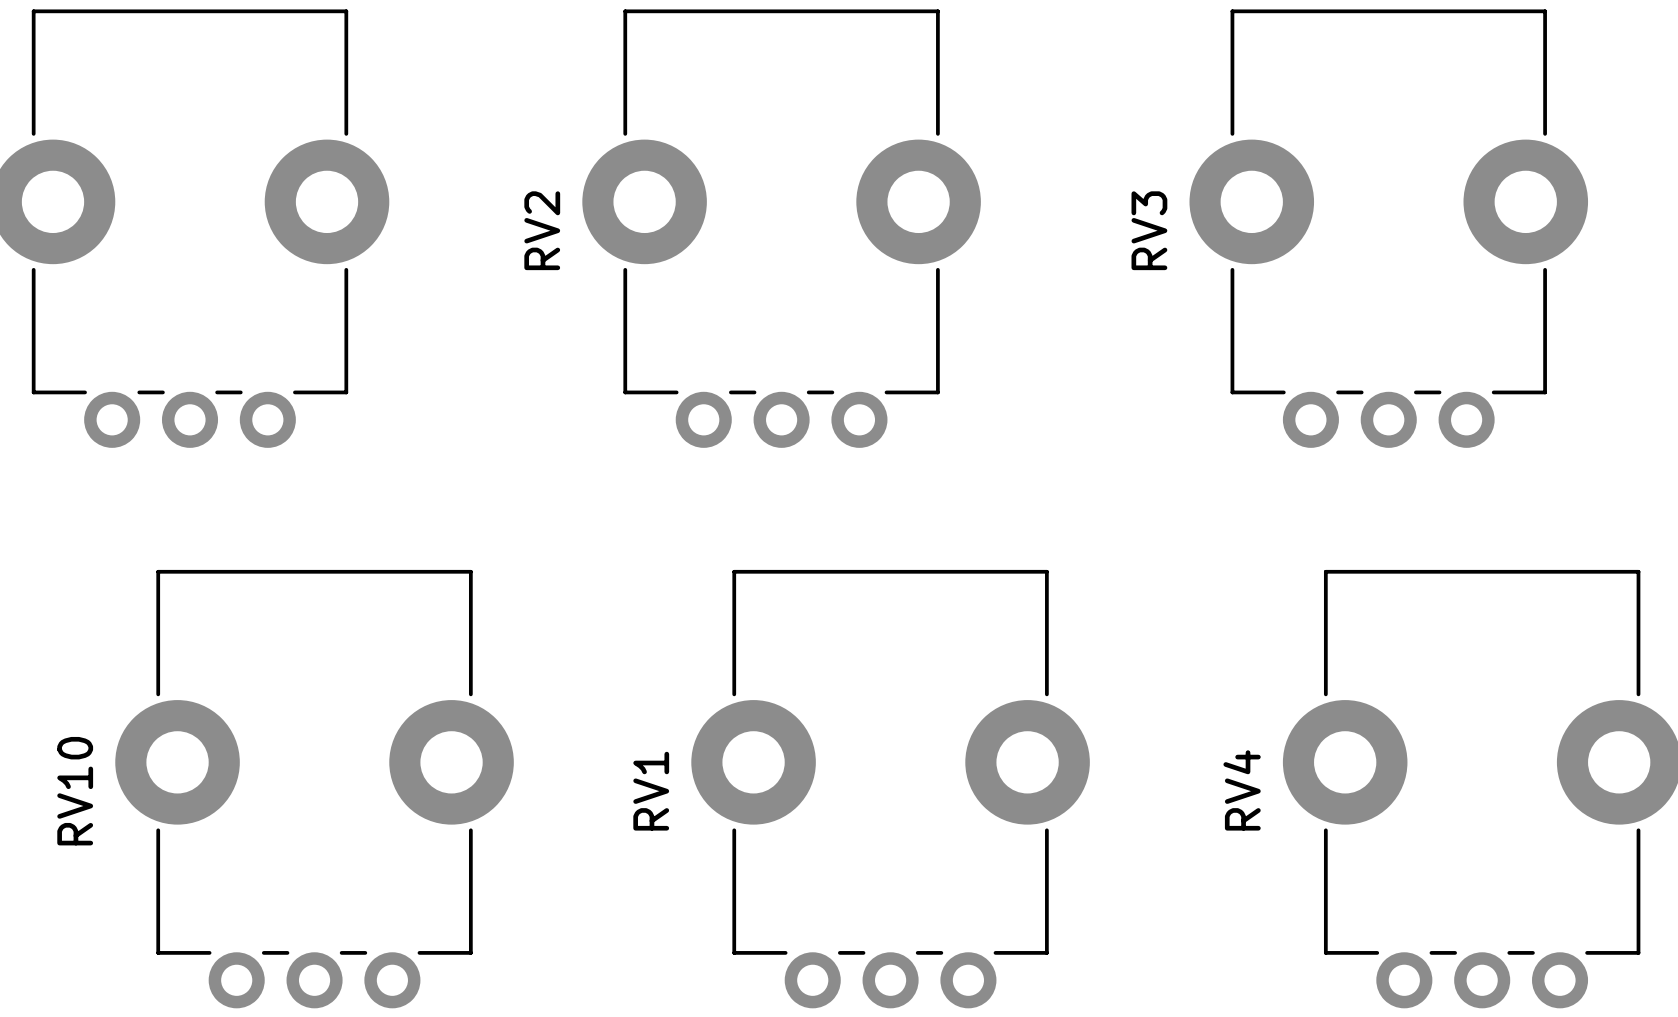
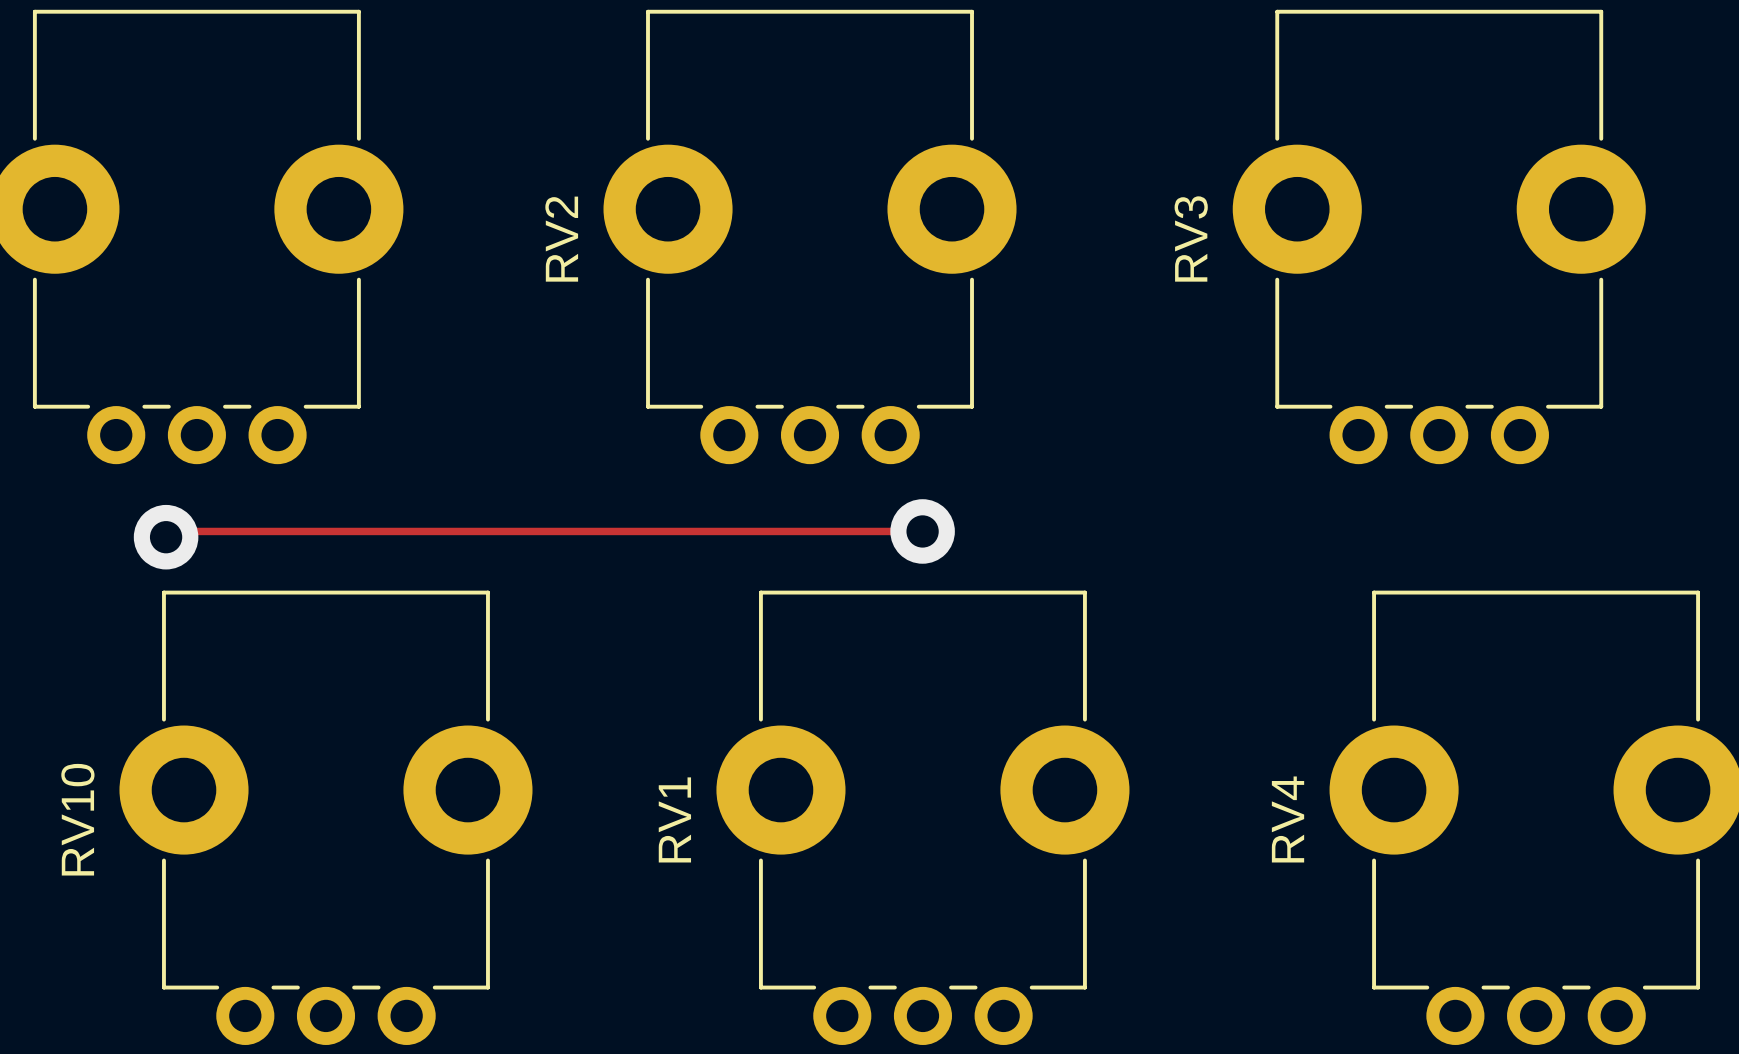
track: none -> (922, 531) (171, 531) (166, 537)
via: none -> (922, 531)
via: none -> (166, 537)

